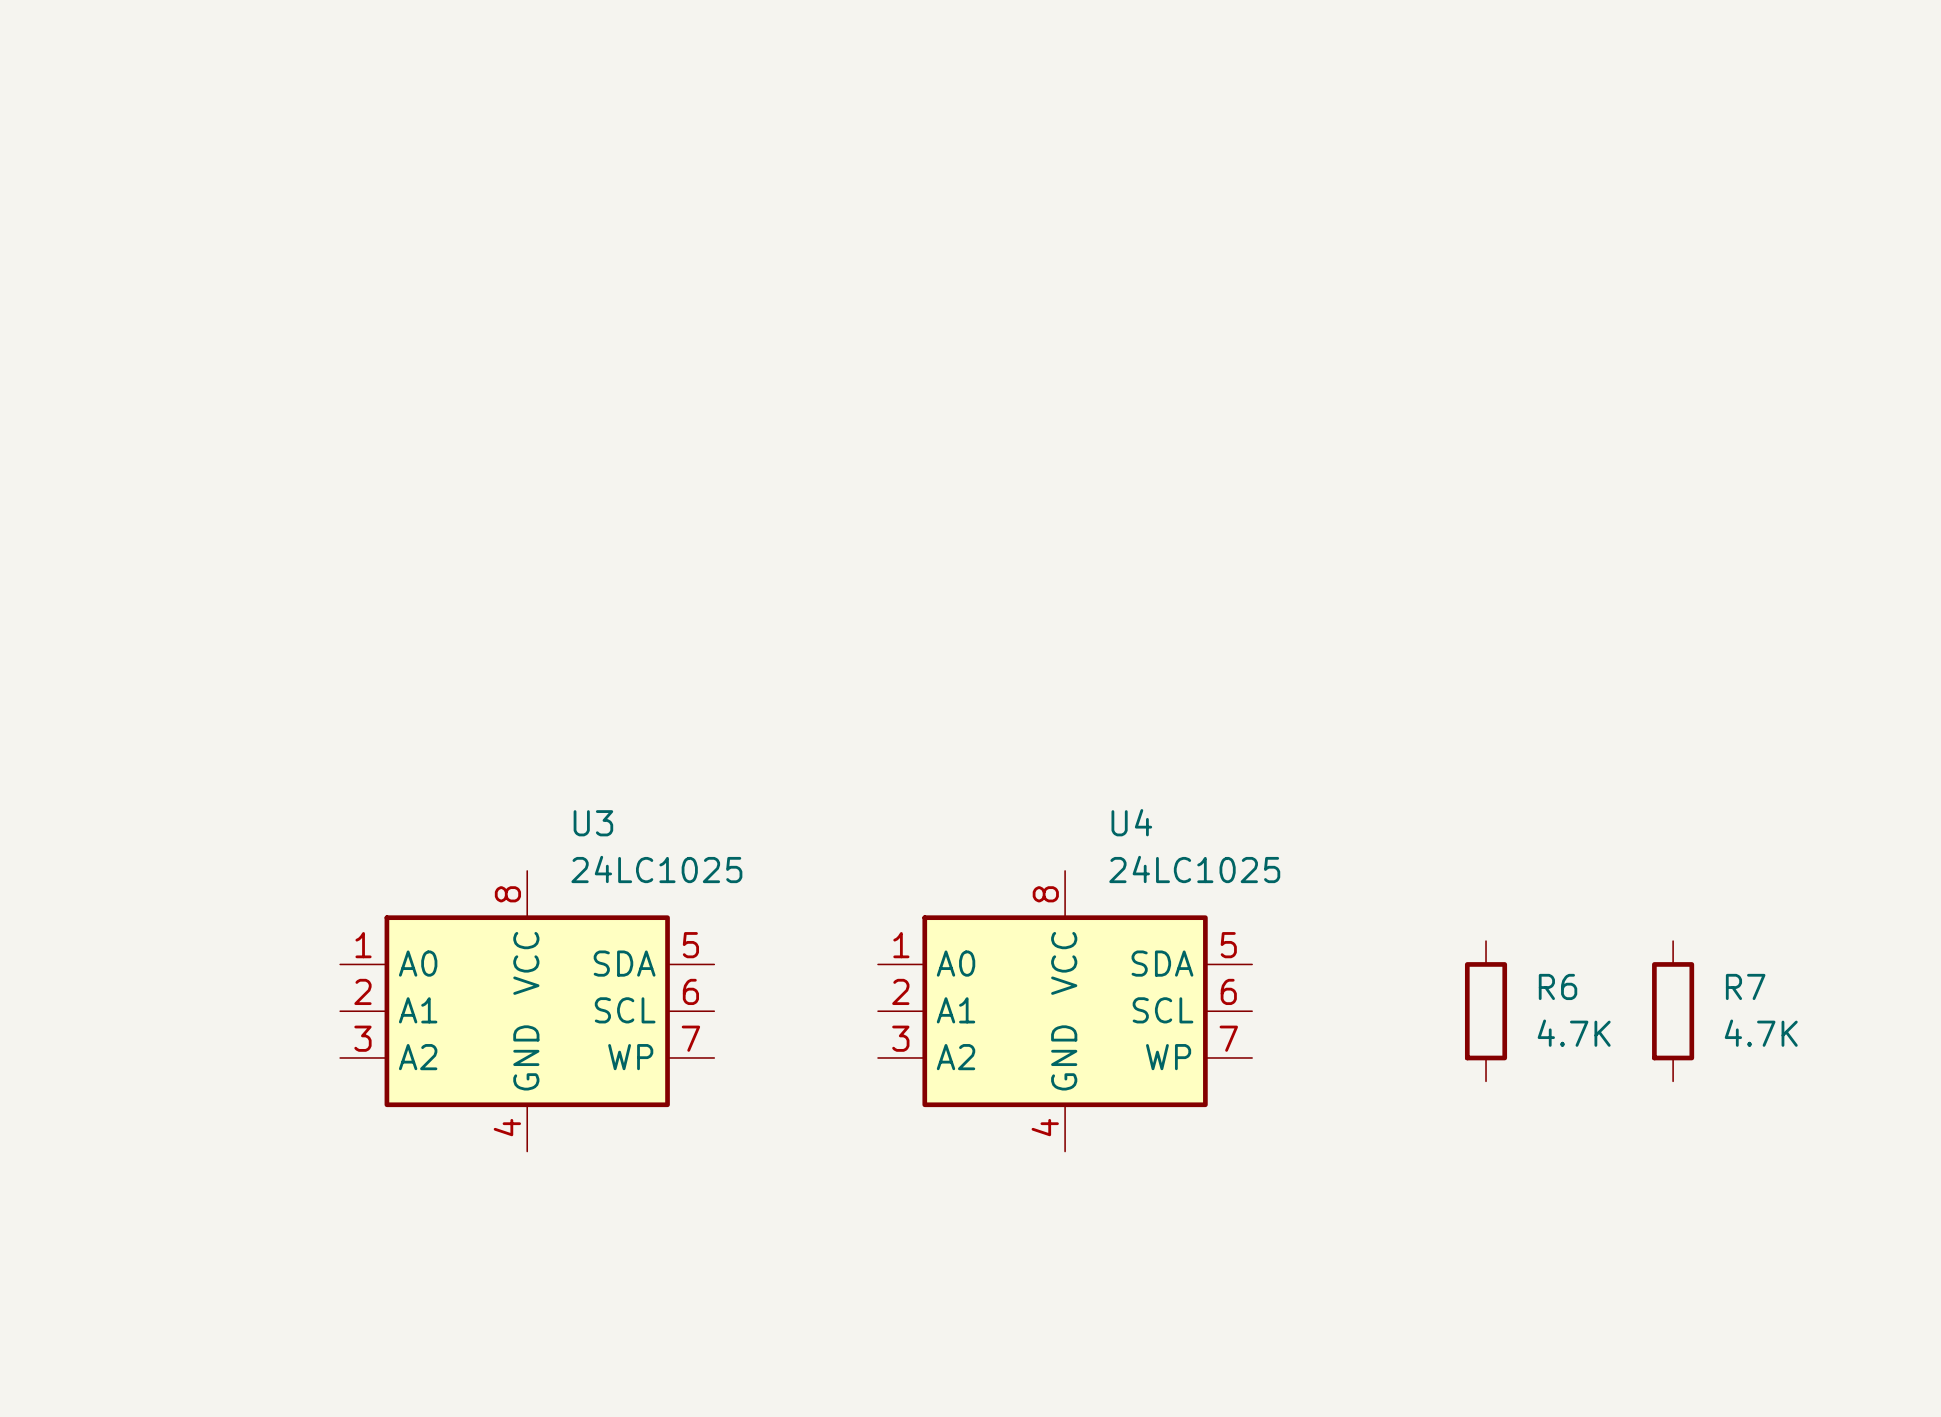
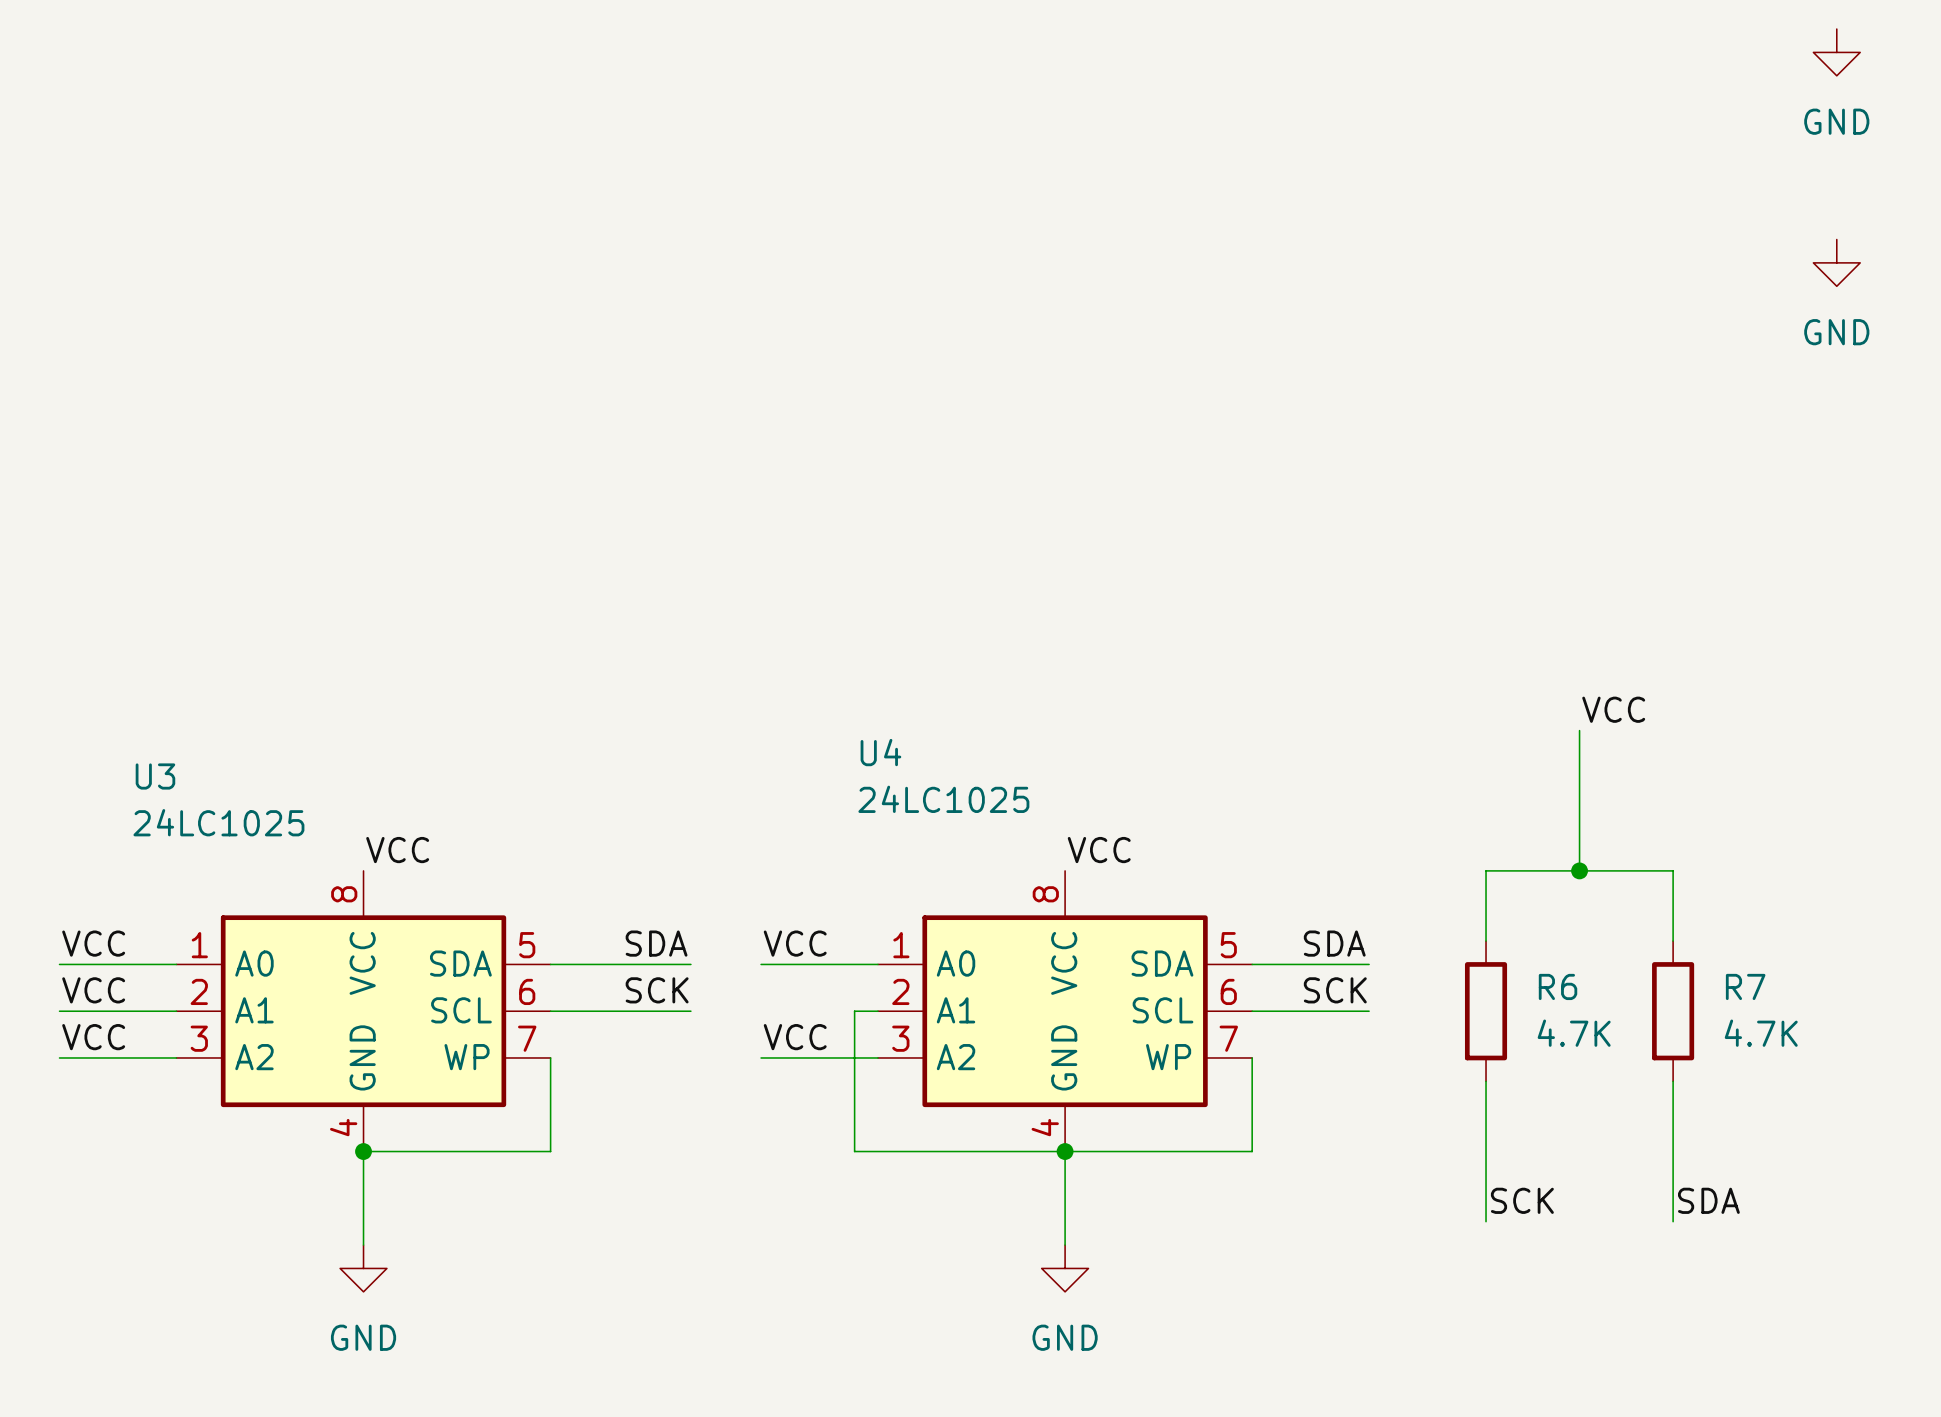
power symbol: none -> GND (1836, 52)
power symbol: none -> GND (1836, 262)
label: none -> VCC (1613, 709)
wire: none -> (1579, 730) (1579, 870)
U4 name position: U4 (1131, 822) -> U4 (880, 752)
U3 name position: U3 (593, 823) -> U3 (155, 776)
label: none -> VCC (397, 850)
label: none -> VCC (1099, 850)
U3 value position: 24LC1025 (656, 869) -> 24LC1025 (218, 822)
U4 value position: 24LC1025 (1194, 869) -> 24LC1025 (943, 799)
junction: none -> (1579, 870)
wire: none -> (1486, 941) (1486, 870) (1673, 870) (1673, 941)
label: none -> VCC (93, 943)
label: none -> SDA (656, 943)
label: none -> VCC (795, 943)
label: none -> SDA (1334, 943)
wire: none -> (59, 964) (176, 964)
wire: none -> (761, 964) (878, 964)
wire: none -> (1252, 964) (1369, 964)
label: none -> VCC (93, 990)
label: none -> SCK (657, 990)
label: none -> SCK (1335, 990)
wire: none -> (59, 1011) (176, 1011)
U3 position: (527, 1011) -> (363, 1011)
wire: none -> (878, 1011) (854, 1011) (854, 1151) (1252, 1151) (1252, 1057)
wire: none -> (1252, 1011) (1369, 1011)
label: none -> VCC (93, 1037)
label: none -> VCC (795, 1037)
wire: none -> (59, 1057) (176, 1057)
wire: none -> (550, 1057) (550, 1151) (363, 1151) (363, 1245)
wire: none -> (761, 1057) (878, 1057)
wire: none -> (1486, 1081) (1486, 1221)
wire: none -> (1673, 1081) (1673, 1221)
junction: none -> (363, 1151)
wire: none -> (1065, 1151) (1065, 1245)
junction: none -> (1065, 1151)
label: none -> SCK (1522, 1200)
label: none -> SDA (1708, 1200)
power symbol: none -> GND (363, 1268)
power symbol: none -> GND (1065, 1268)

